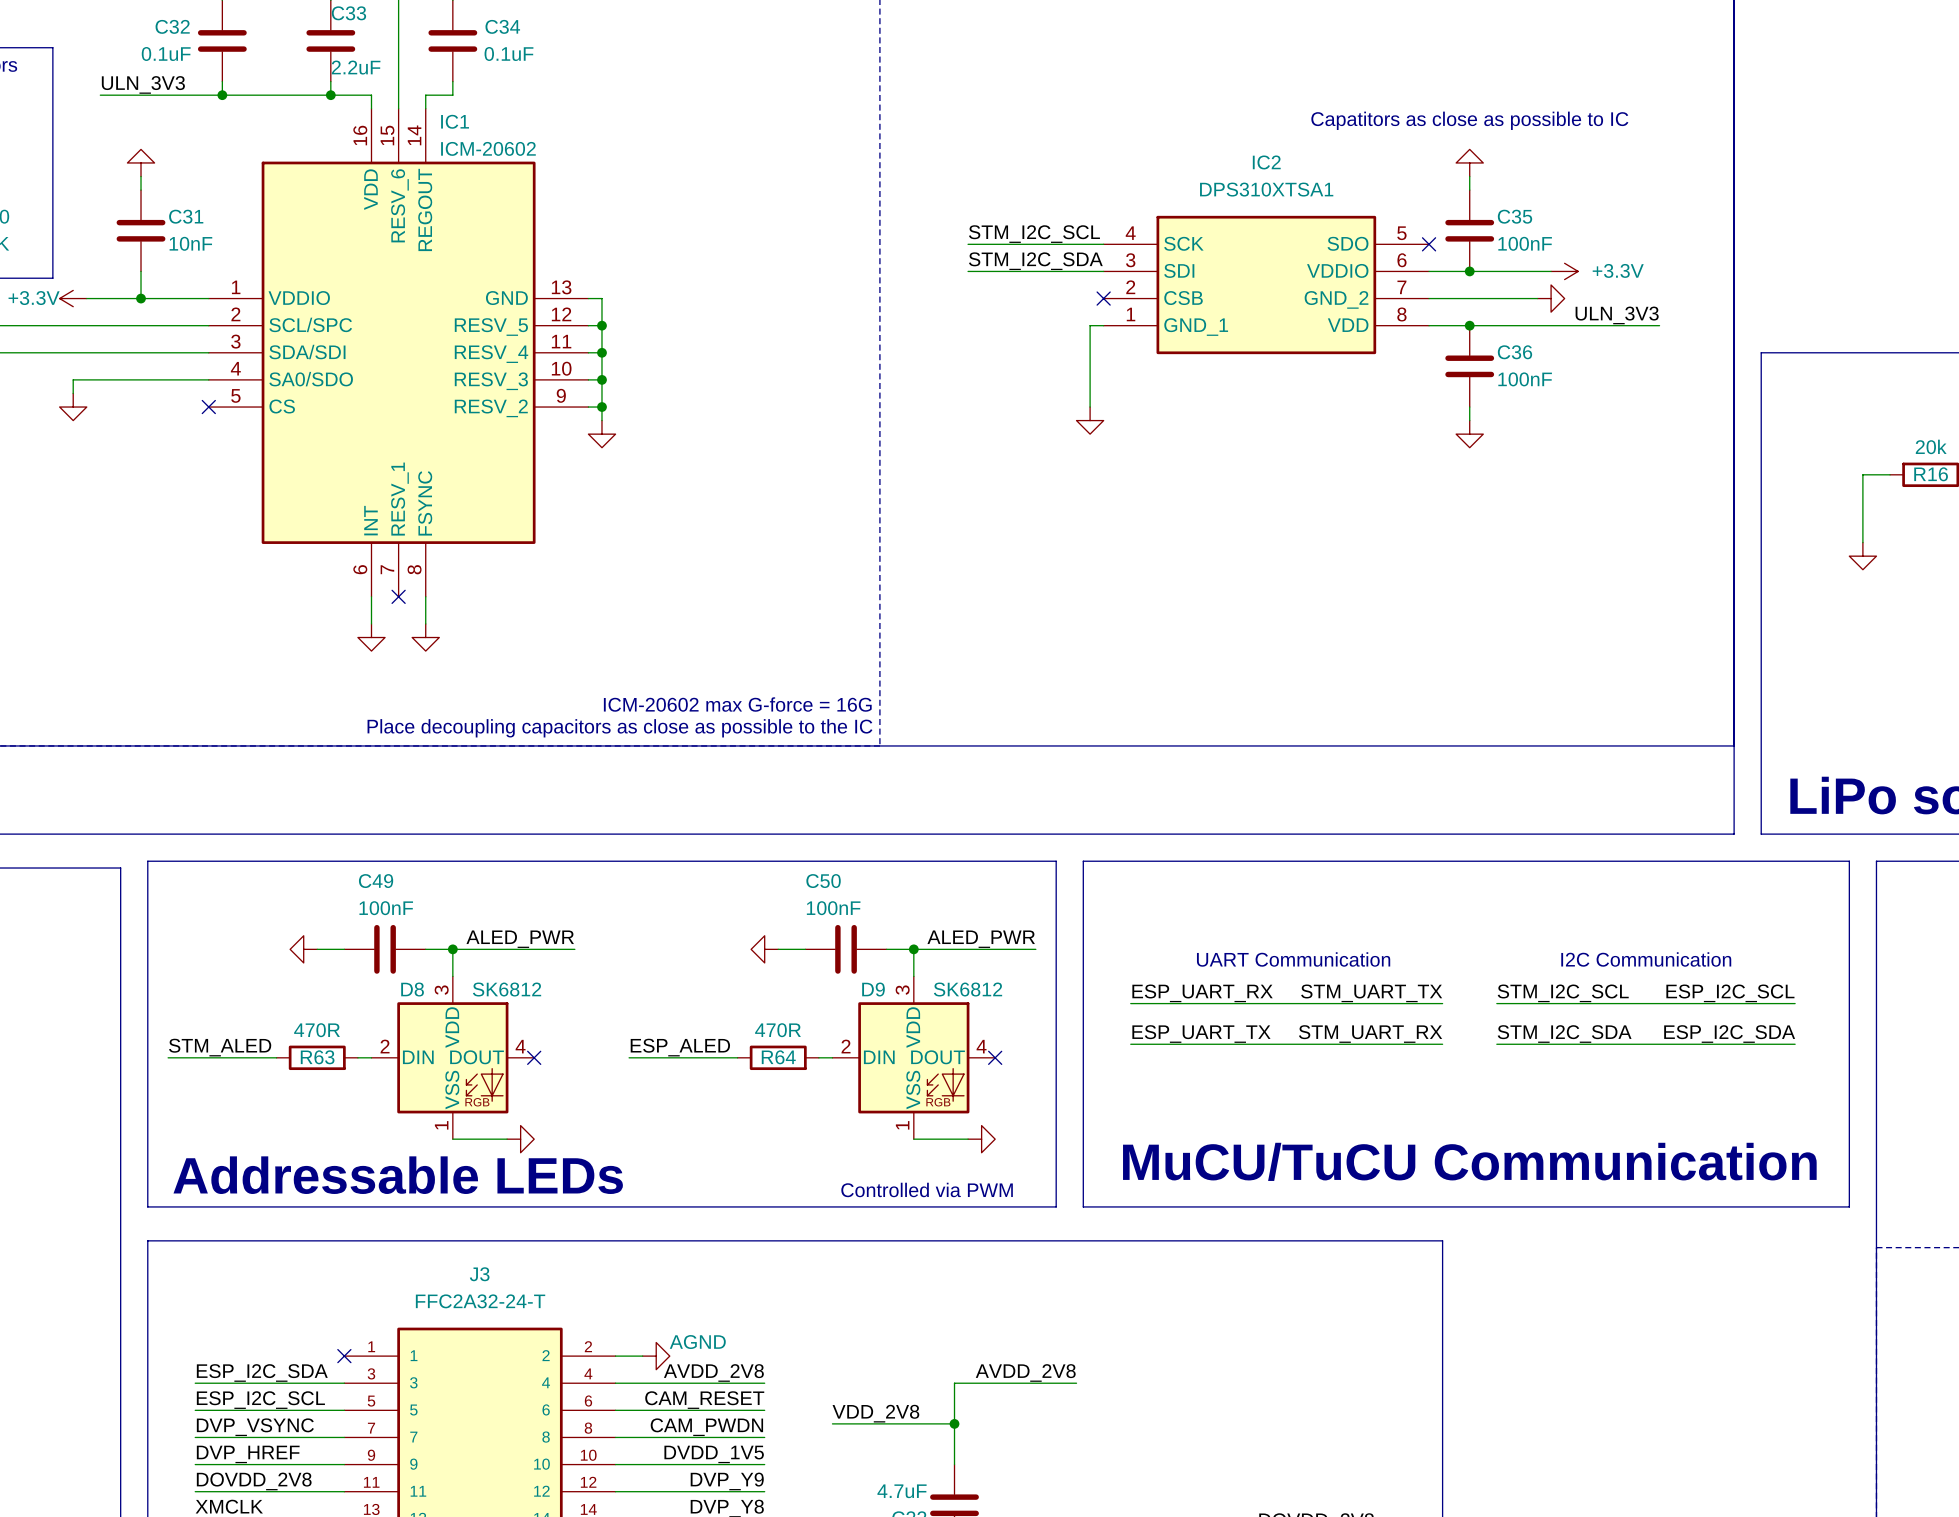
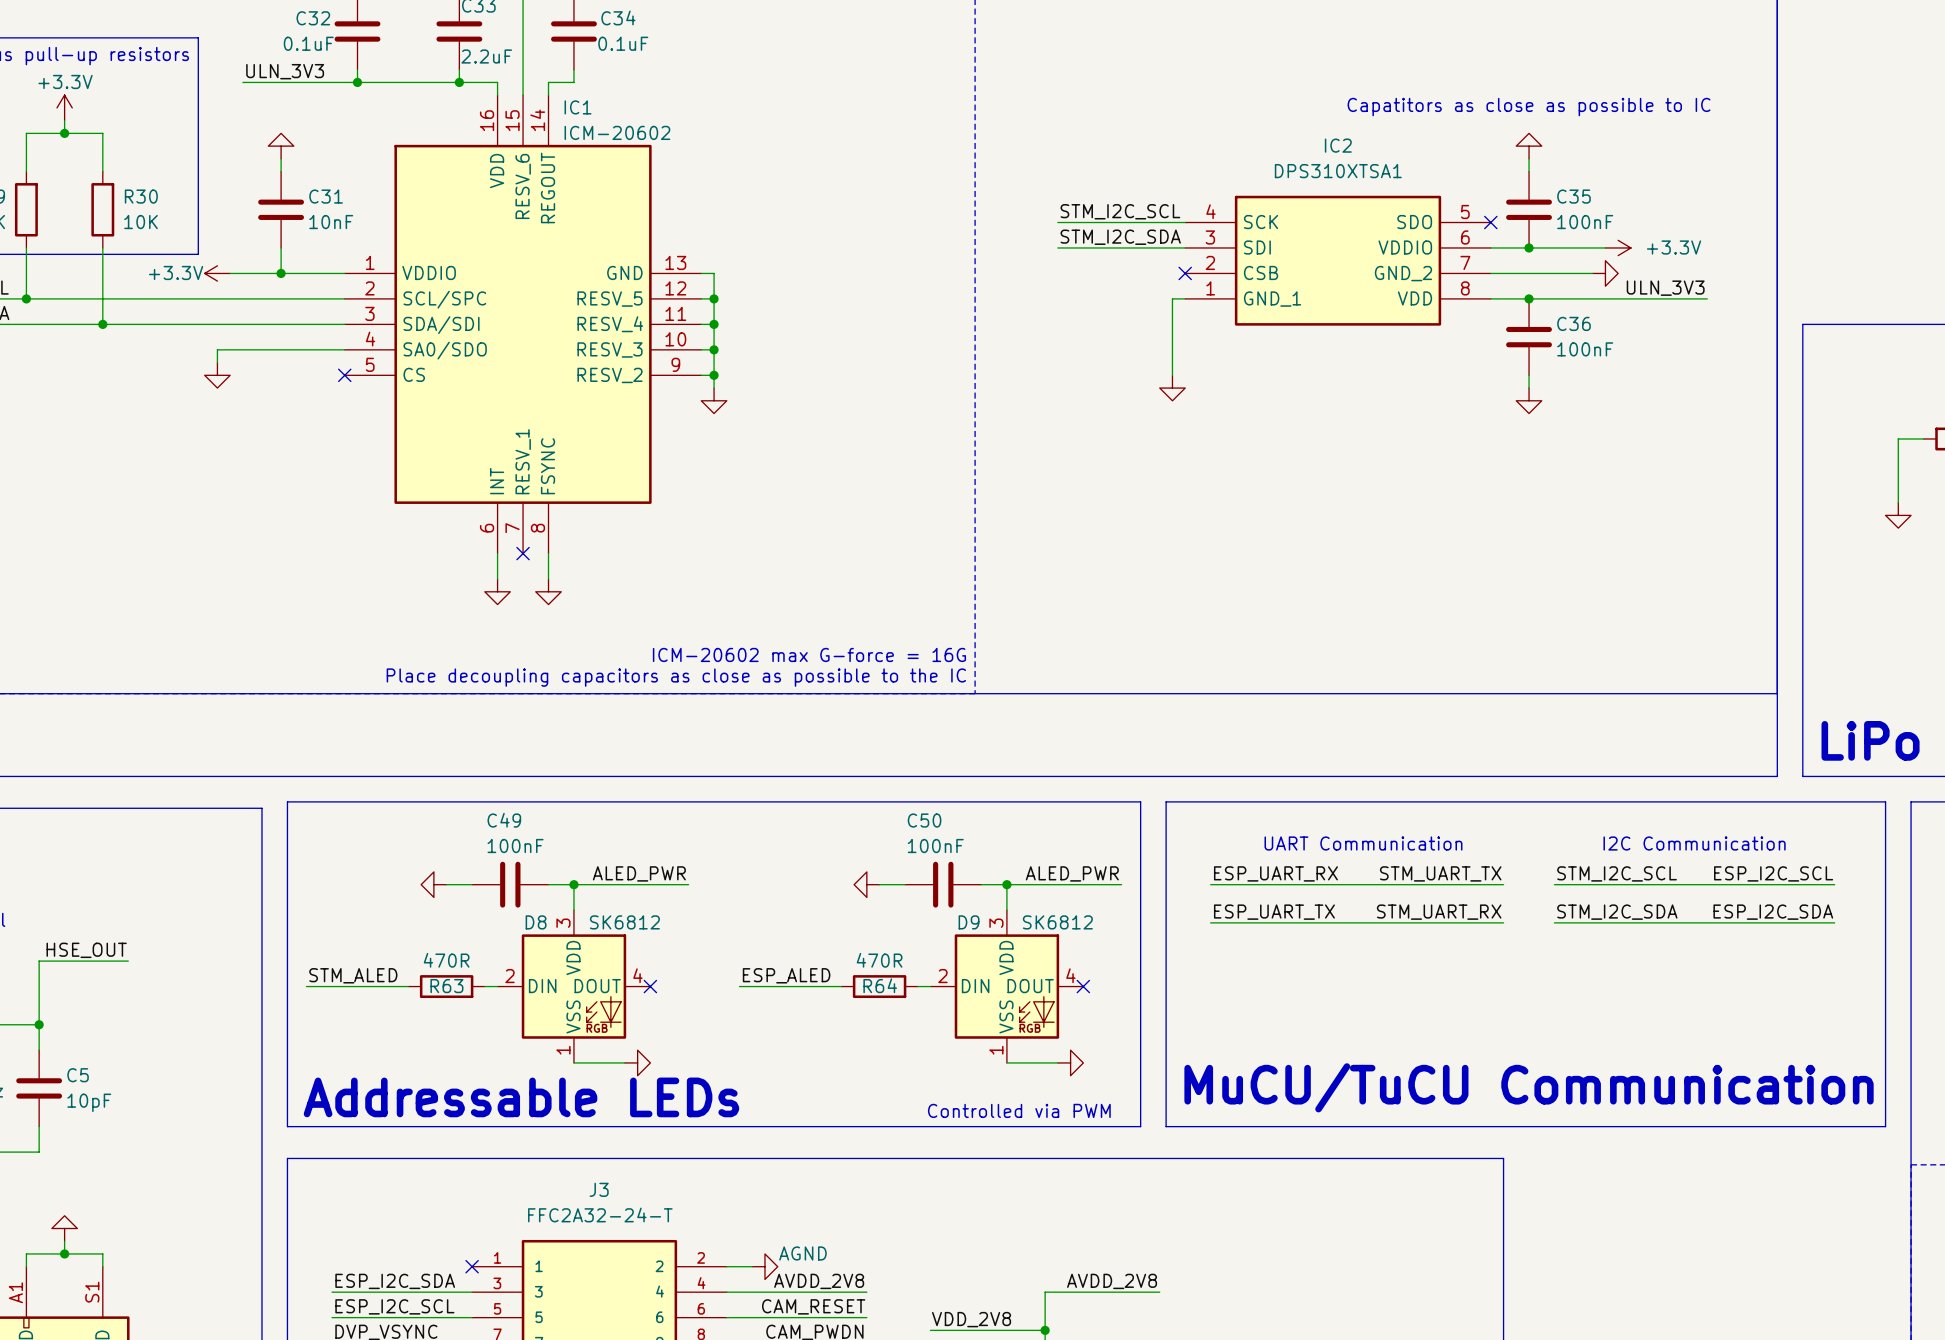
text position: UART Communication (1293, 959) -> UART Communication (1363, 843)
text position: I2C Communication (1646, 959) -> I2C Communication (1694, 843)
label position: ESP_UART_RX (1202, 993) -> ESP_UART_RX (1275, 873)
label position: STM_UART_TX (1371, 993) -> STM_UART_TX (1440, 873)
label position: STM_I2C_SCL (1563, 993) -> STM_I2C_SCL (1617, 873)
label position: ESP_I2C_SCL (1730, 993) -> ESP_I2C_SCL (1773, 873)
wire: (1130, 1003) (1442, 1003) -> (1210, 884) (1503, 884)
wire: (1496, 1003) (1795, 1003) -> (1554, 884) (1834, 884)
label position: ESP_UART_TX (1201, 1034) -> ESP_UART_TX (1274, 912)
label position: STM_UART_RX (1370, 1034) -> STM_UART_RX (1439, 912)
label position: STM_I2C_SDA (1564, 1034) -> STM_I2C_SDA (1617, 912)
label position: ESP_I2C_SDA (1729, 1034) -> ESP_I2C_SDA (1773, 912)
wire: (1130, 1044) (1442, 1044) -> (1210, 922) (1503, 922)
wire: (1496, 1044) (1795, 1044) -> (1554, 922) (1834, 922)

